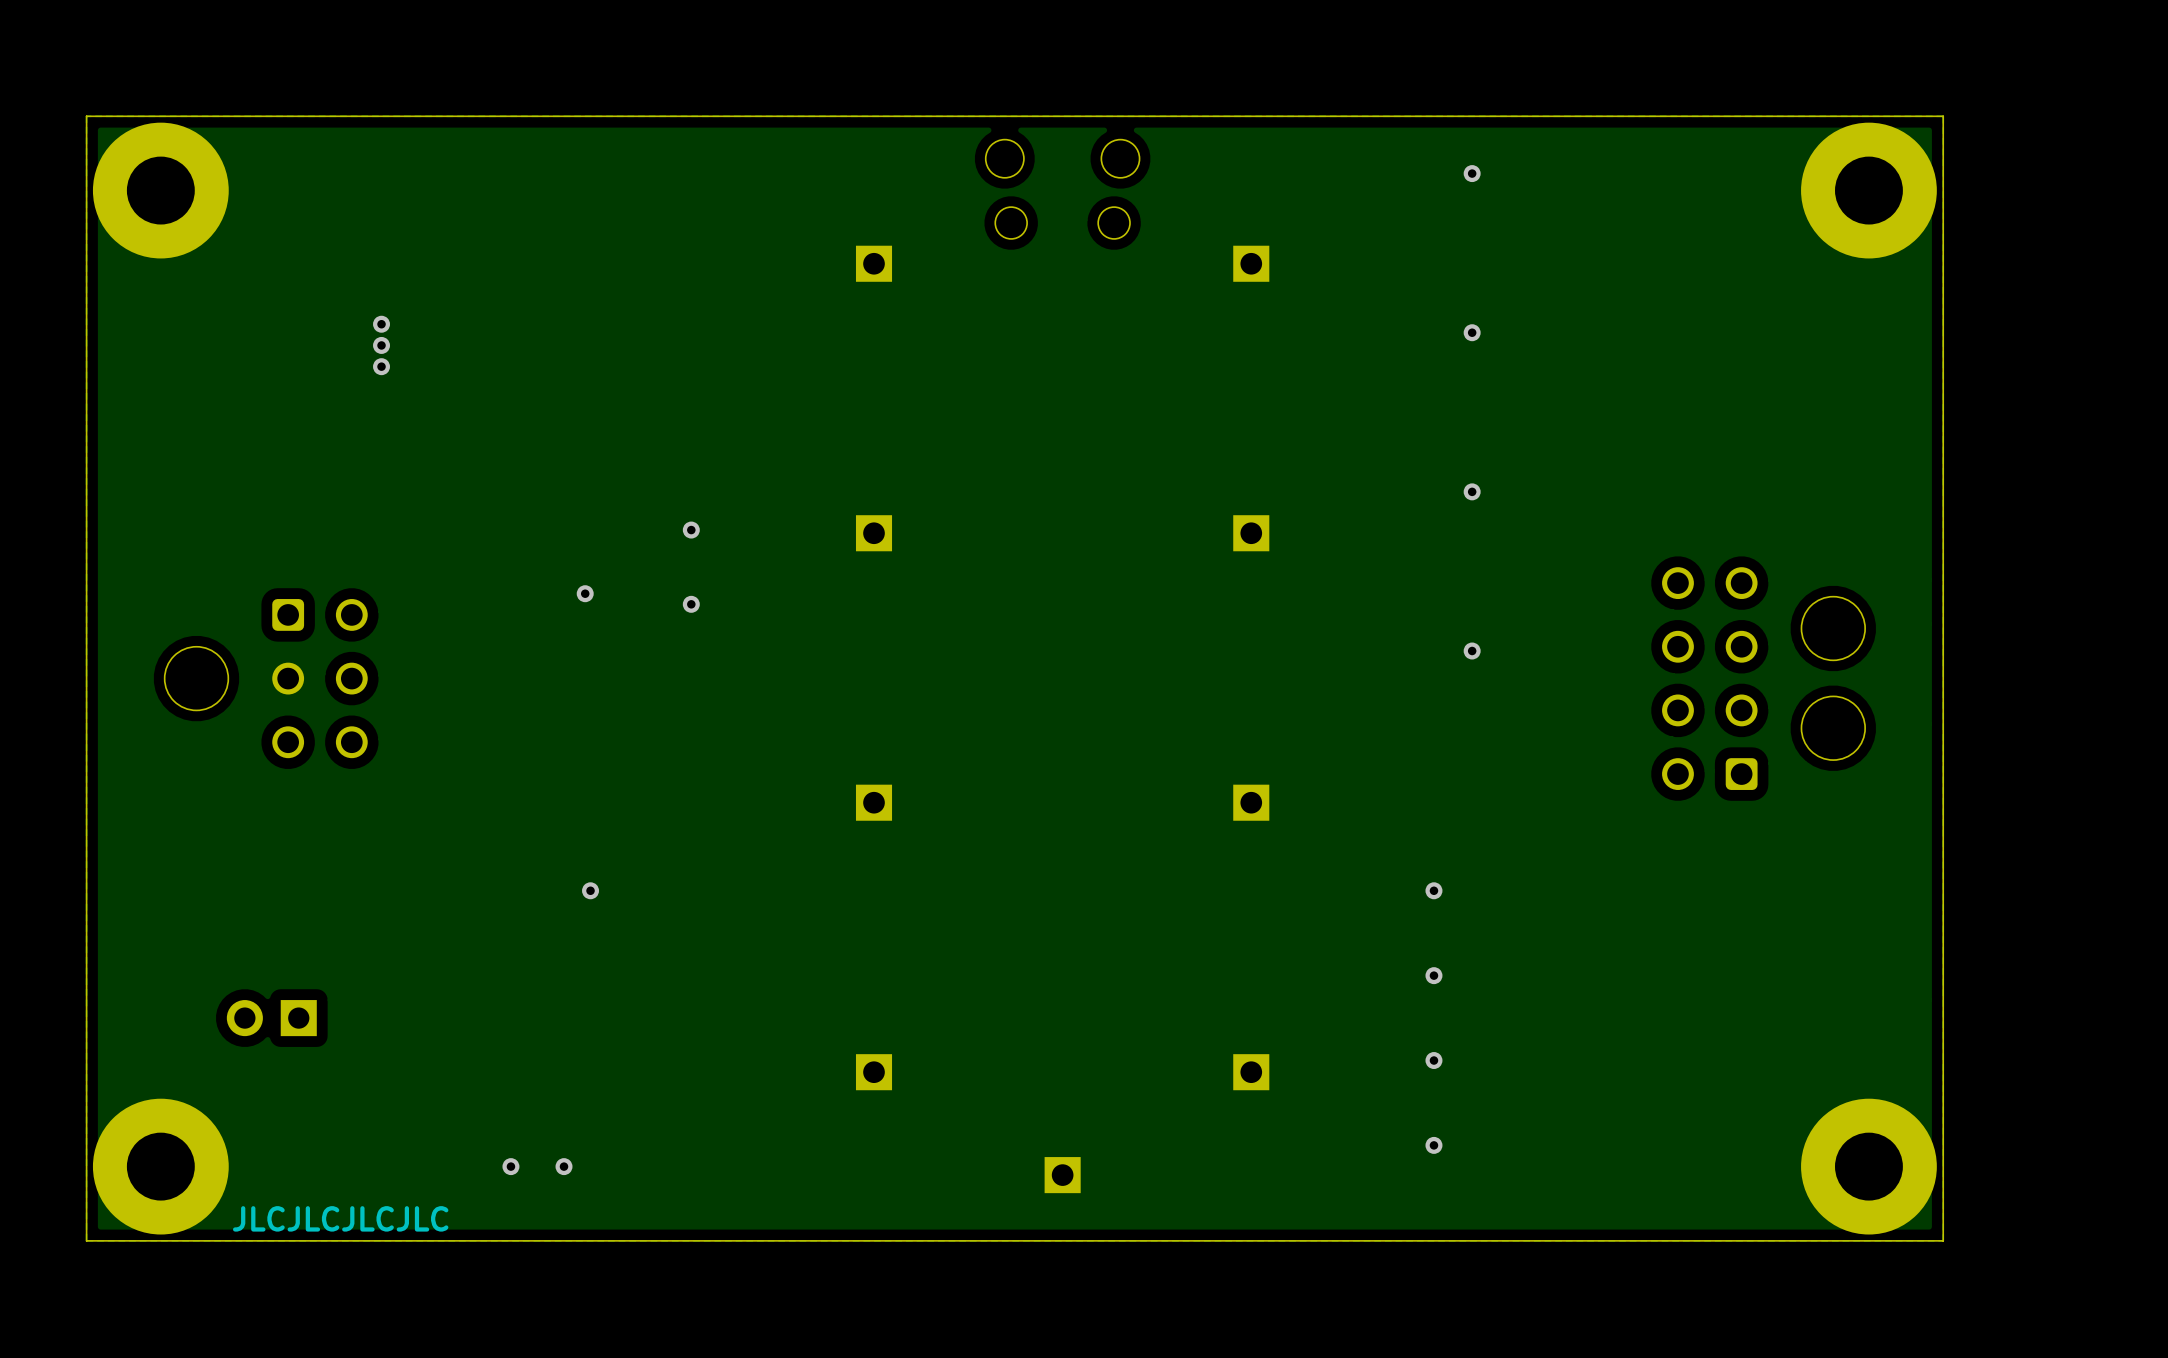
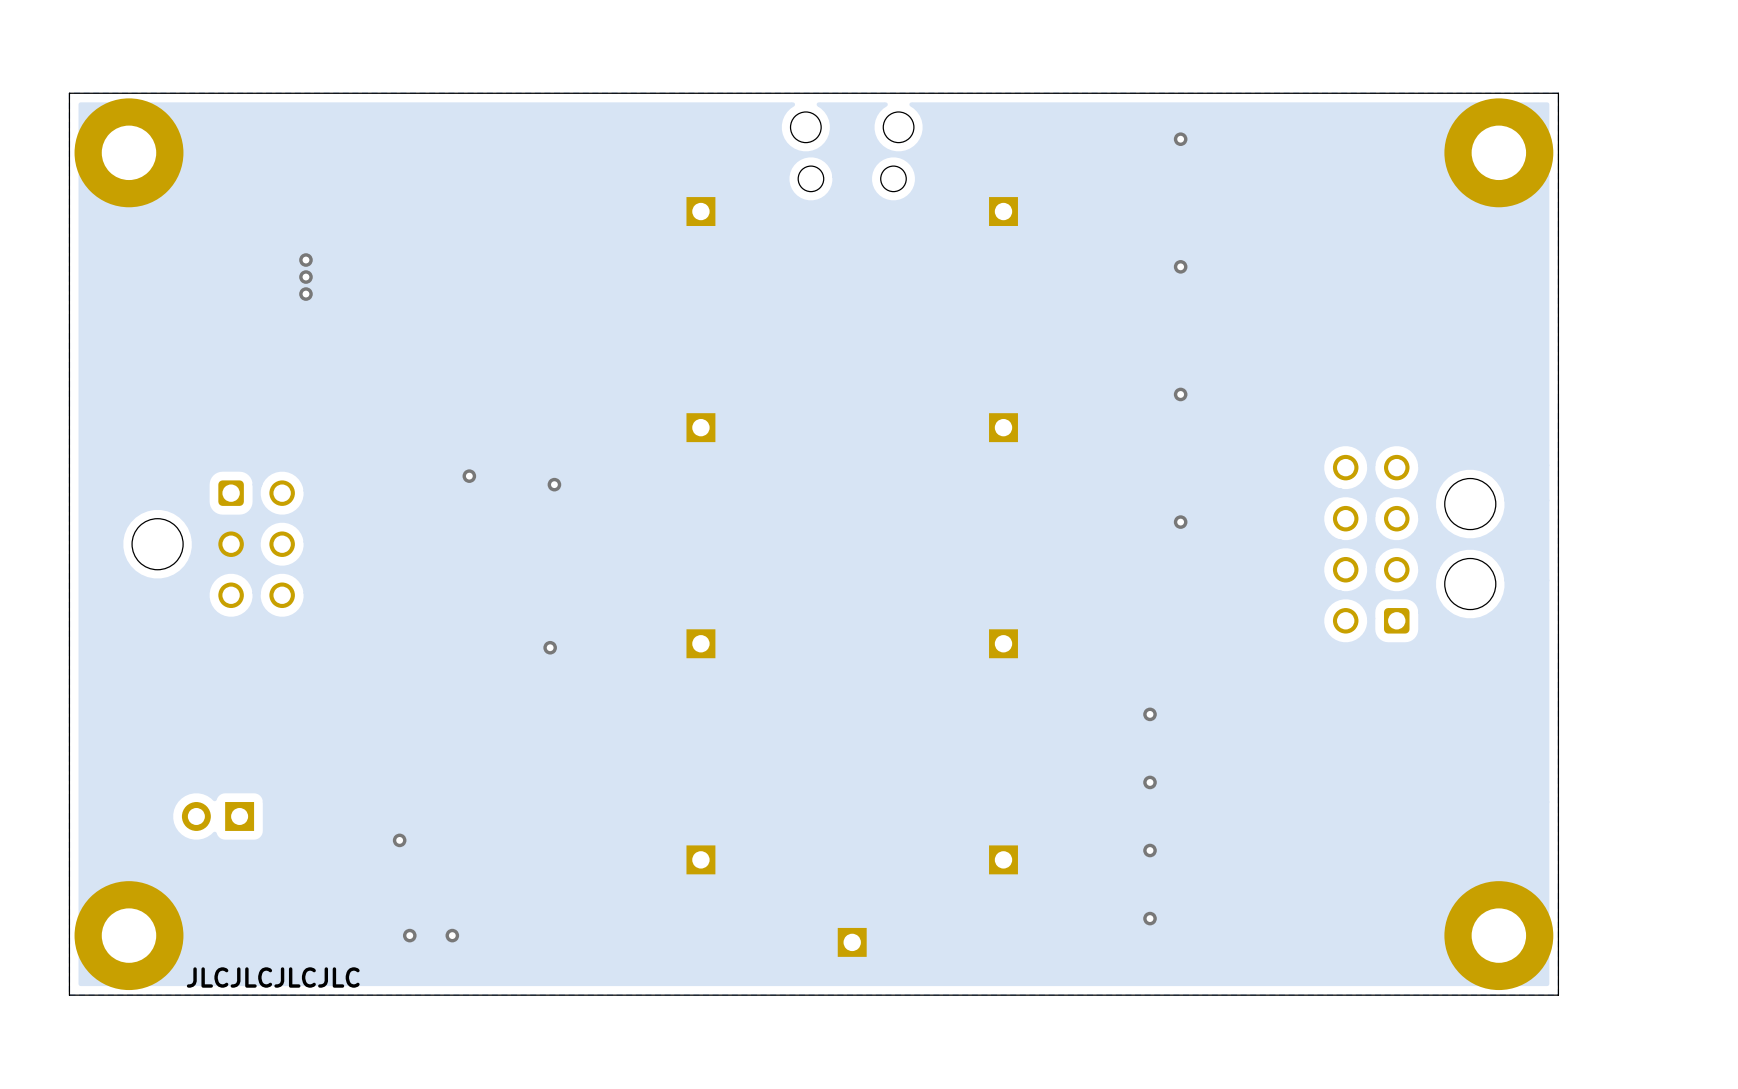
via: (691, 530) -> none
via: none -> (550, 647)
via: (590, 890) -> none
via: none -> (399, 840)

